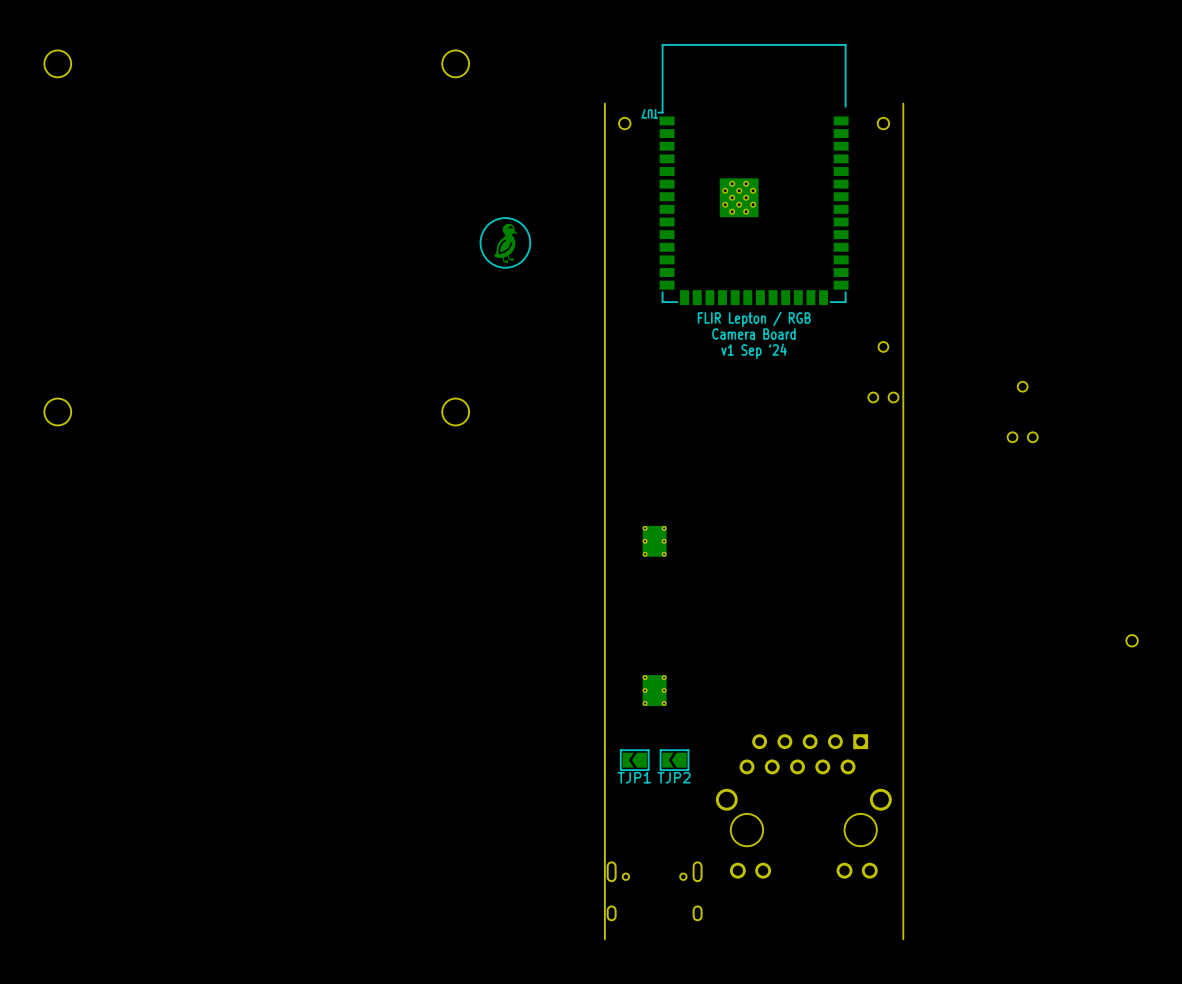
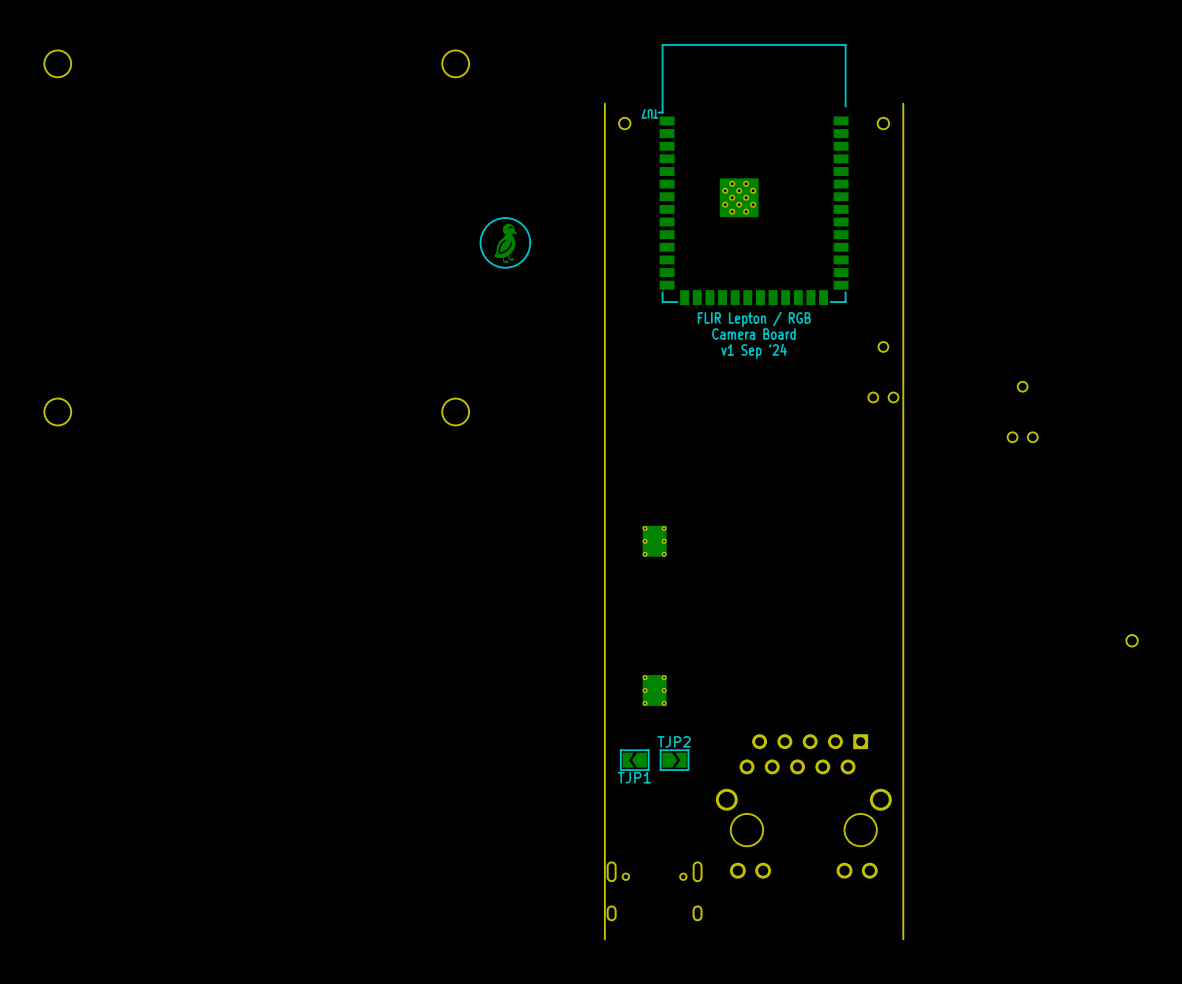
TJP2 rotation: 0° (674, 760) -> 180° (674, 760)

